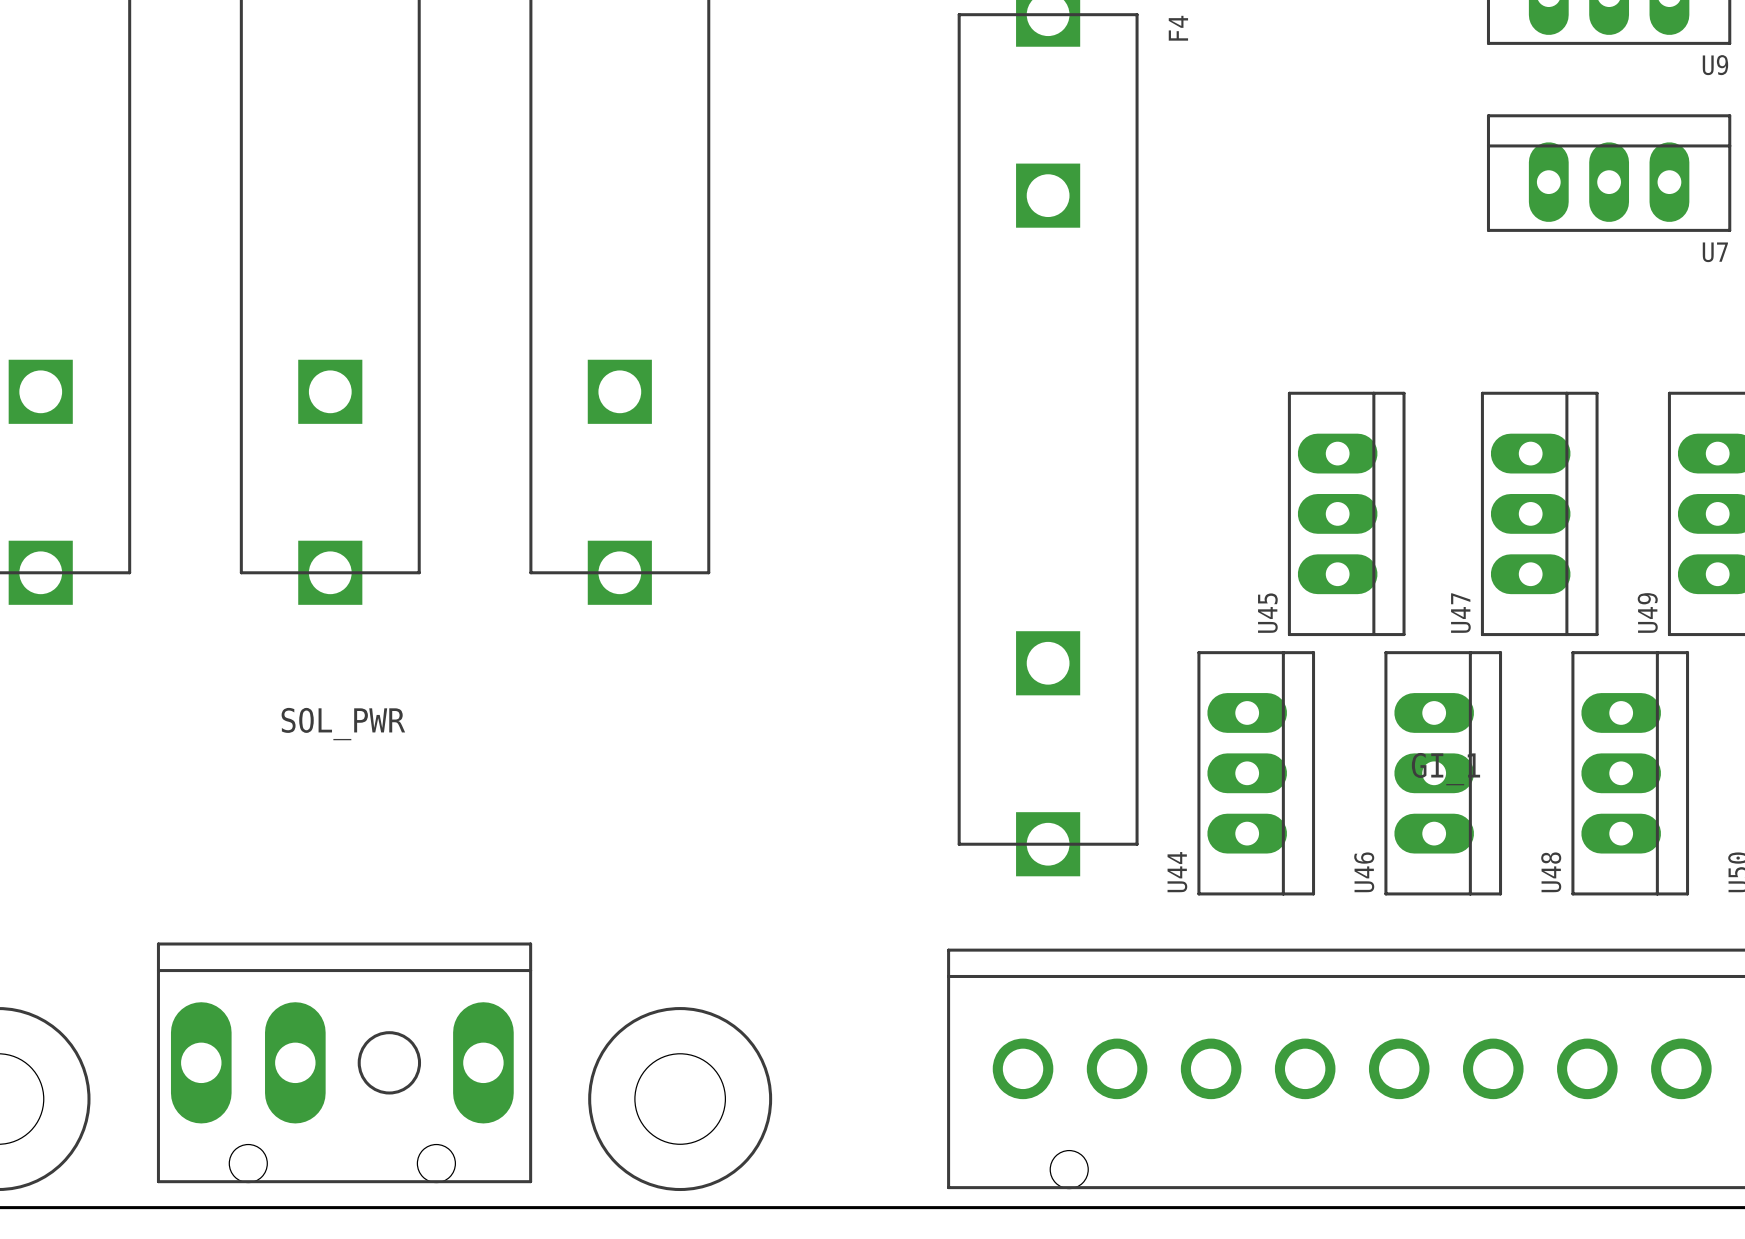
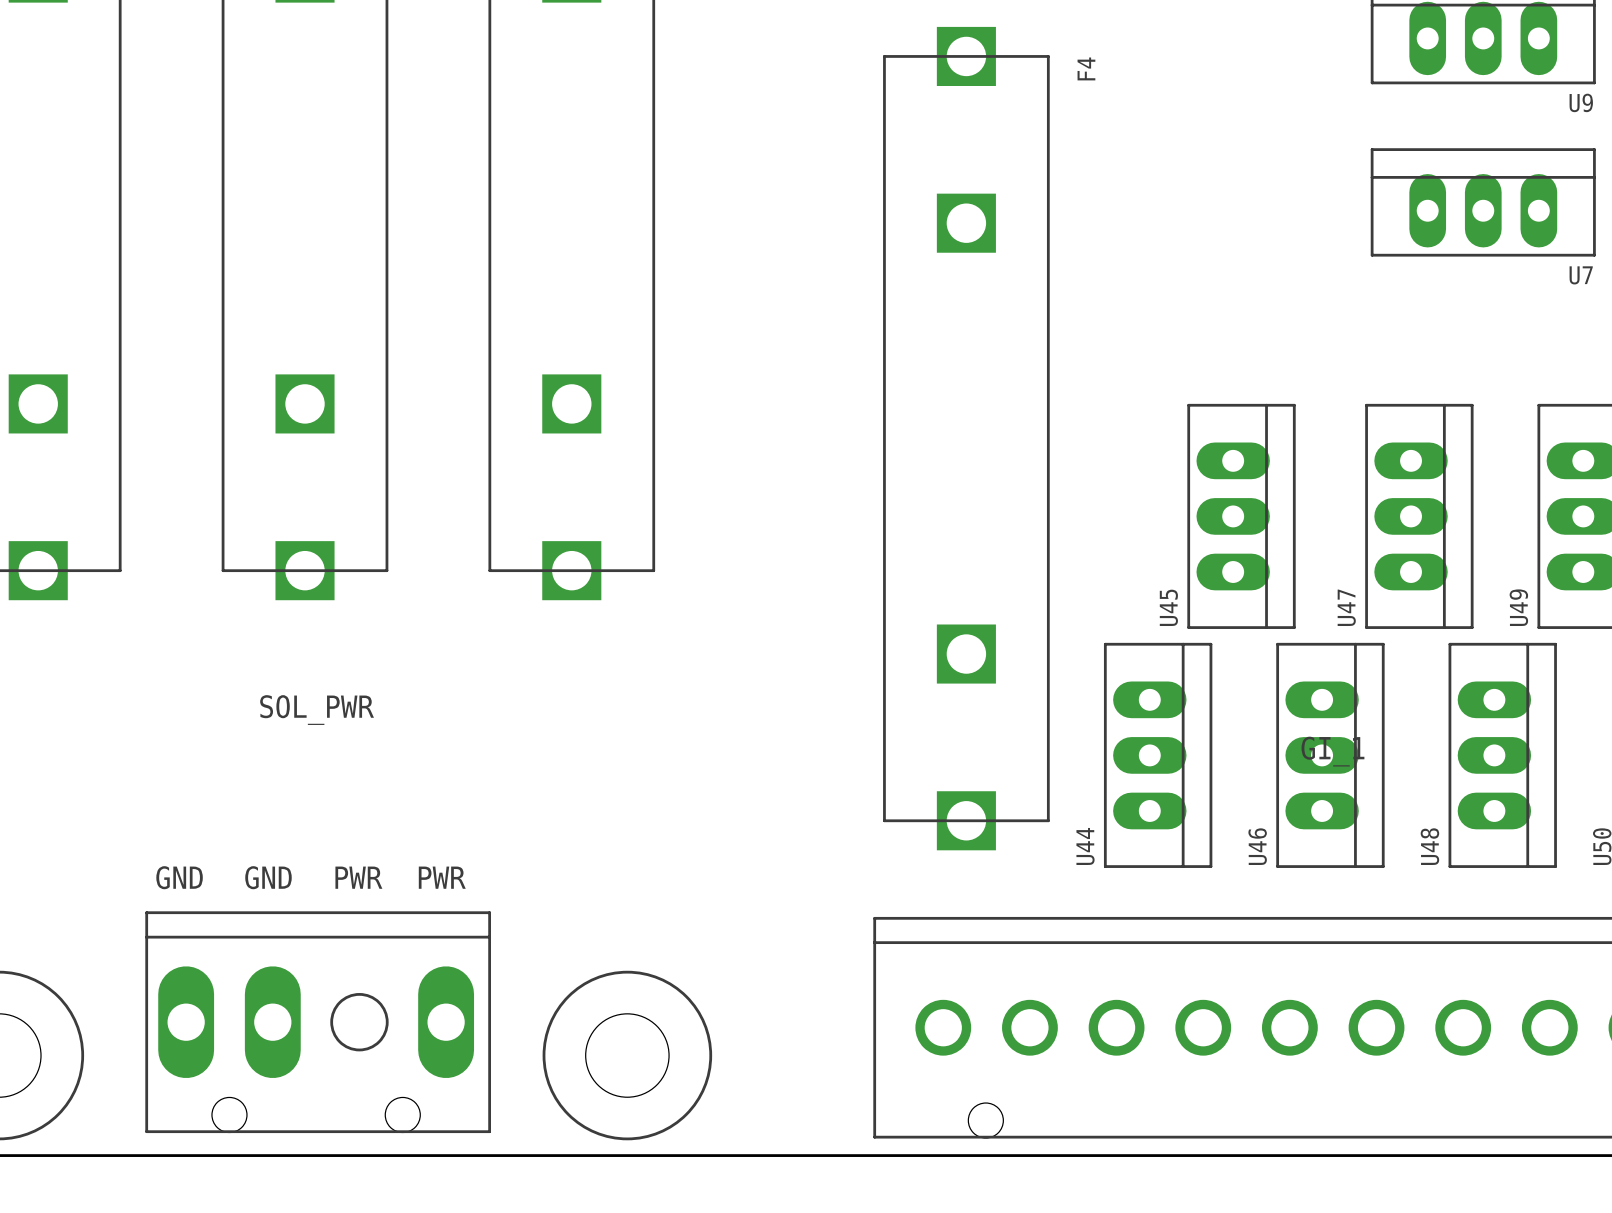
text: none -> GND (179, 877)
text: none -> GND (268, 877)
text: none -> PWR (358, 877)
text: none -> PWR (442, 877)

